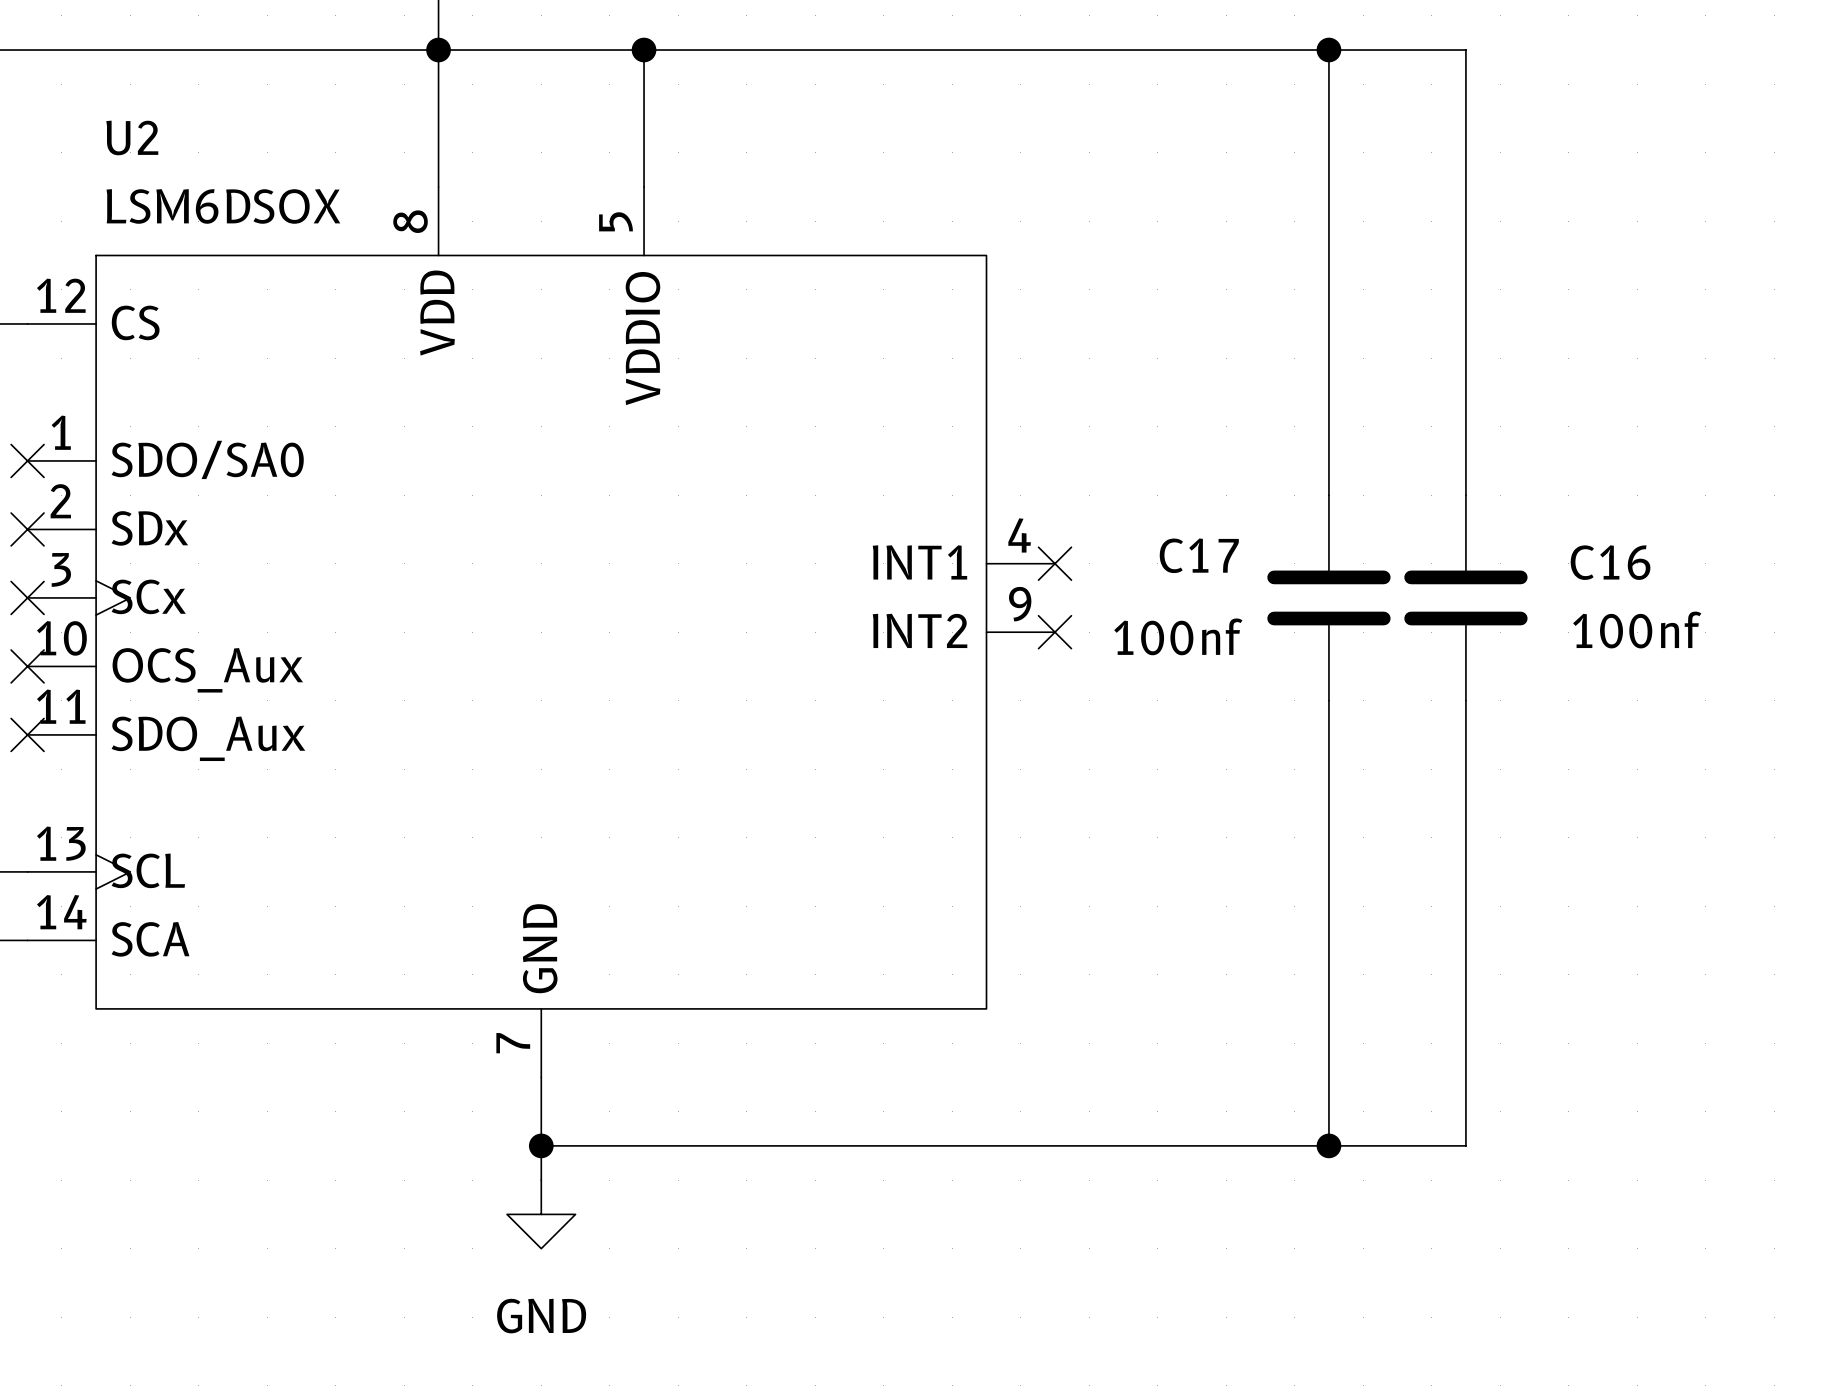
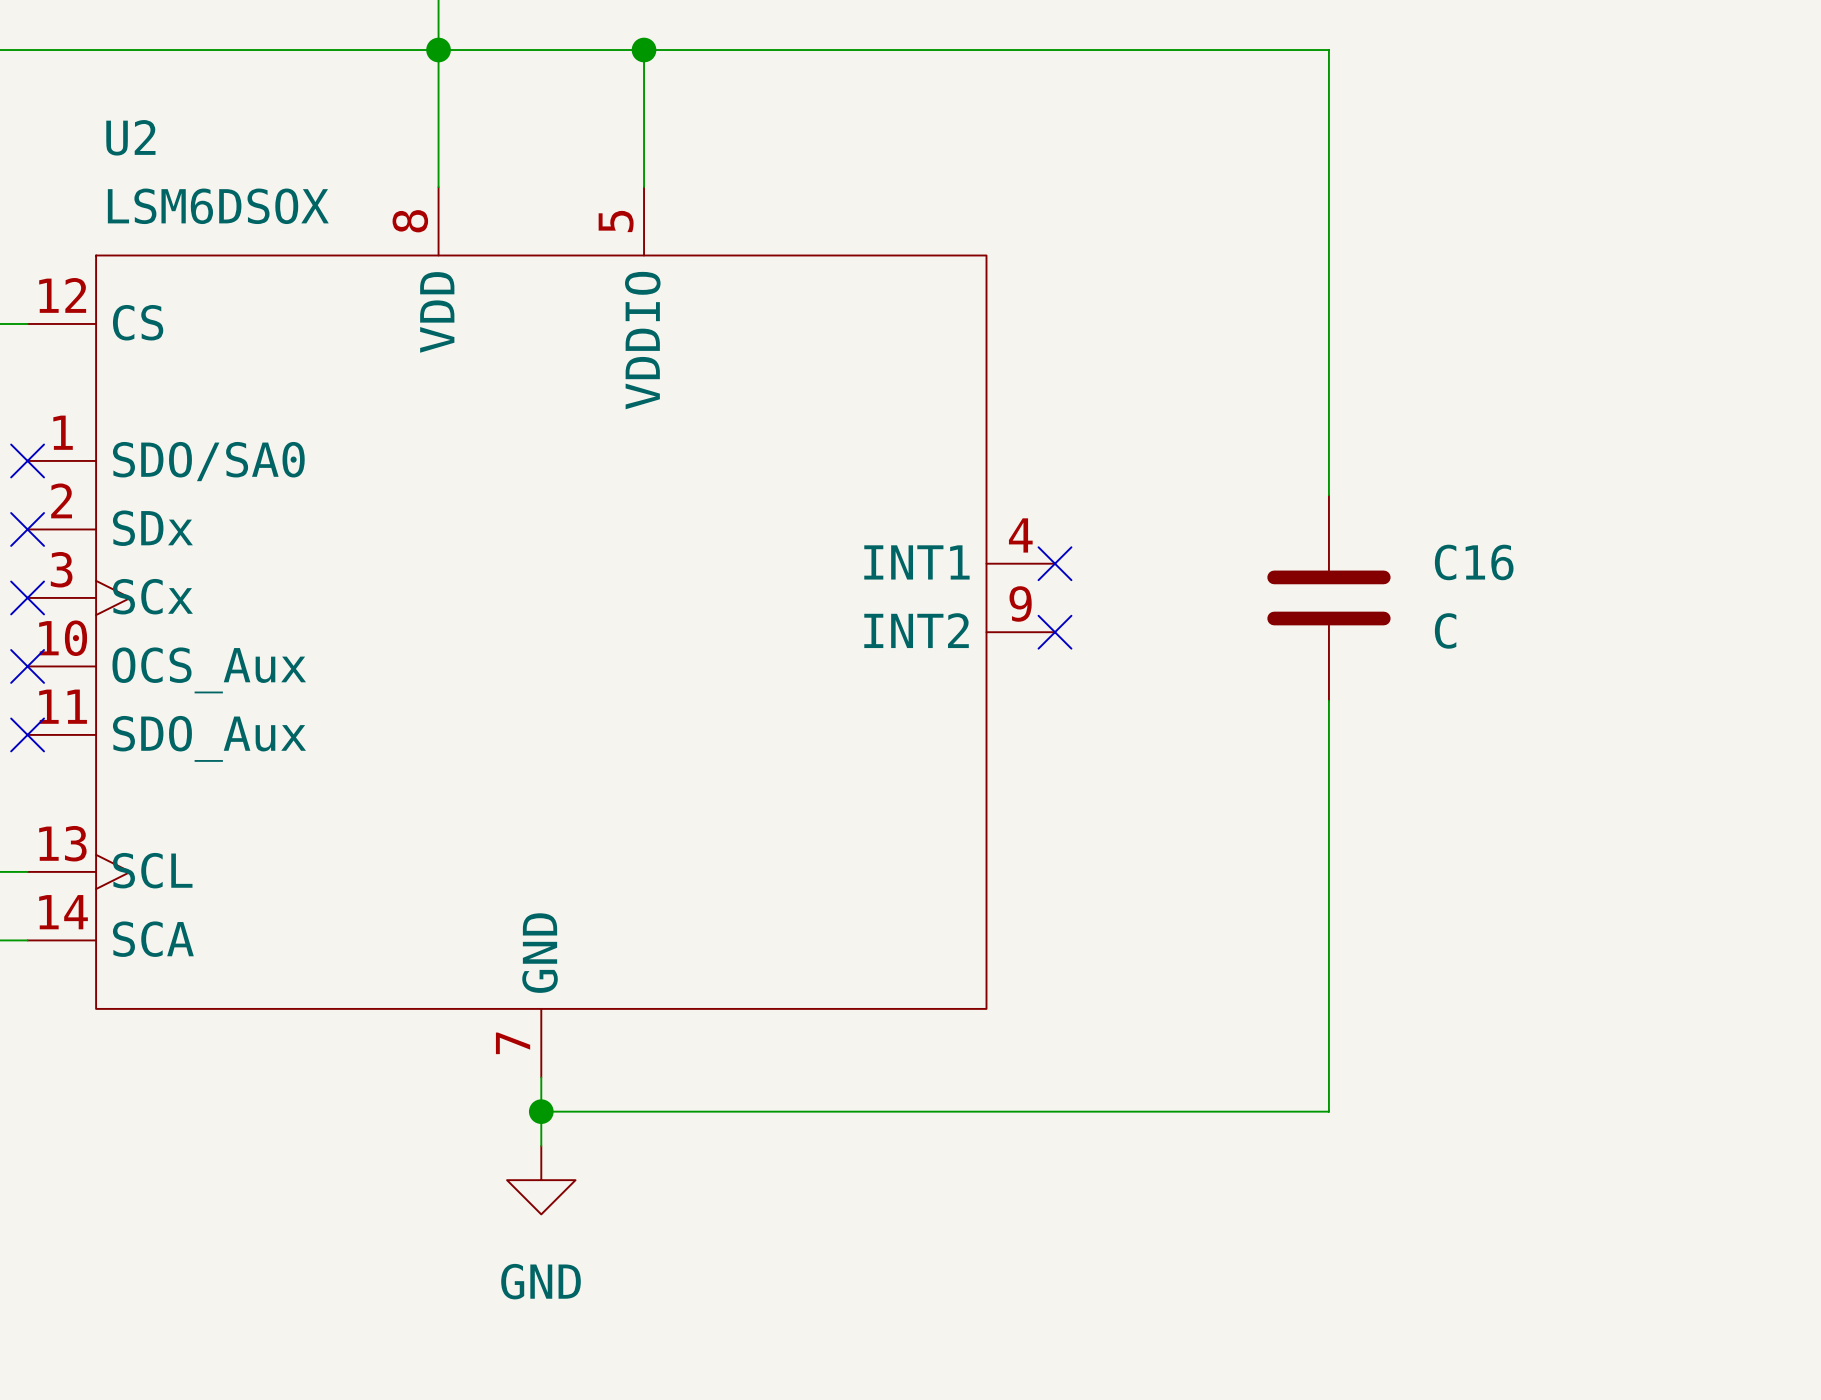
wire: (1328, 50) (1465, 50) (1465, 495) -> none
junction: (1328, 50) -> none
C17 name: C17 (1199, 555) -> C16 (1474, 562)
C16: 100nf (1465, 597) -> none
C17 value: 100nf (1178, 636) -> C (1445, 630)
wire: (1465, 700) (1465, 1145) (541, 1145) (541, 1180) -> none
wire: (1328, 1111) (1328, 1145) -> (1328, 1111) (541, 1111)
junction position: (541, 1145) -> (541, 1111)
junction: (1328, 1145) -> none
power symbol position: GND (541, 1214) -> GND (541, 1180)

